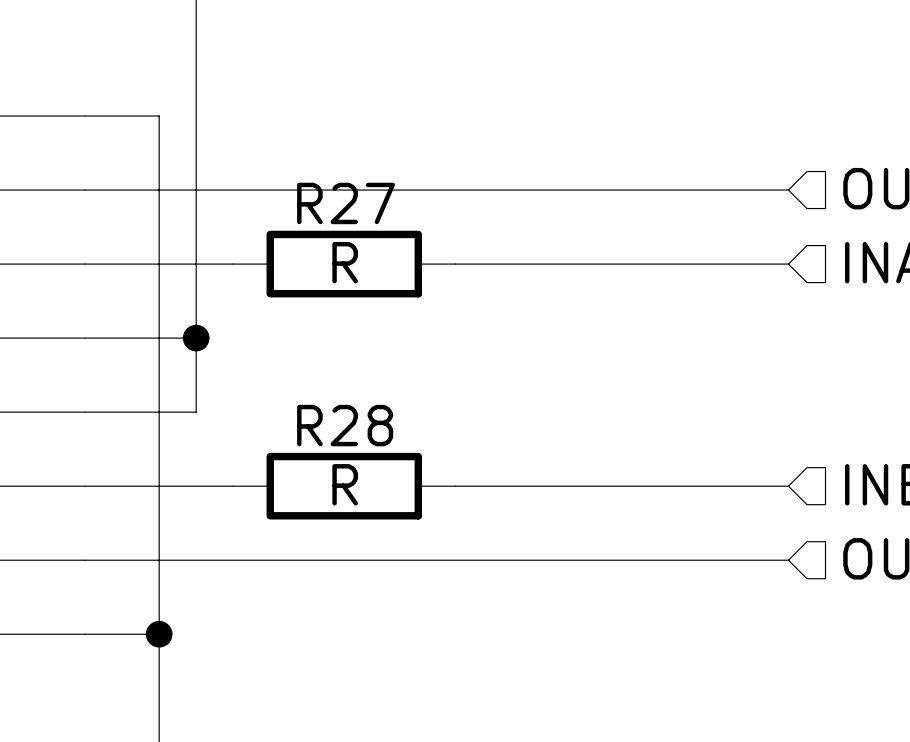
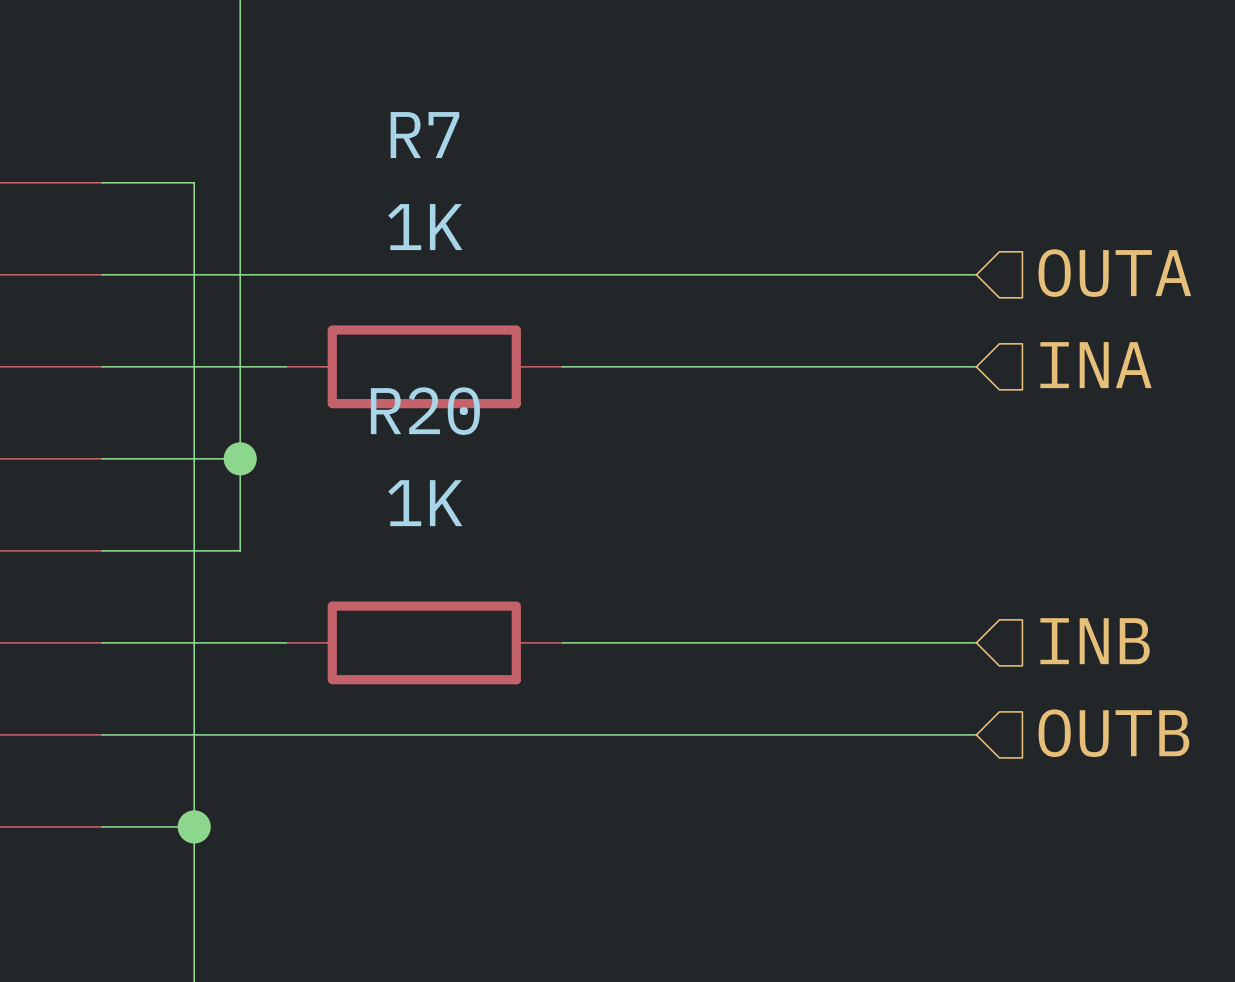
R27 name: R27 (346, 203) -> R7 (424, 135)
R27 value: R (345, 262) -> 1K (425, 227)
R28 name: R28 (345, 425) -> R20 (425, 411)
R28 value: R (345, 484) -> 1K (425, 503)

